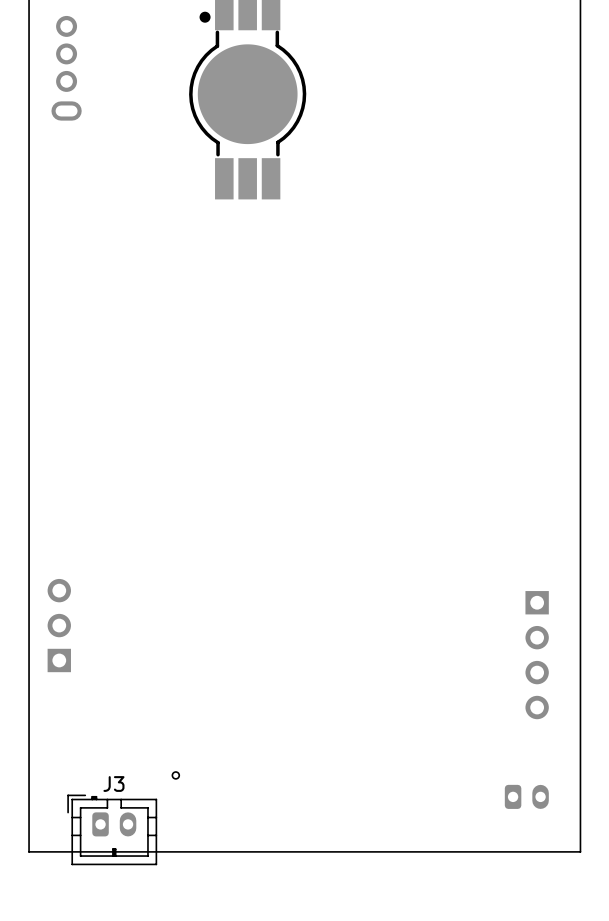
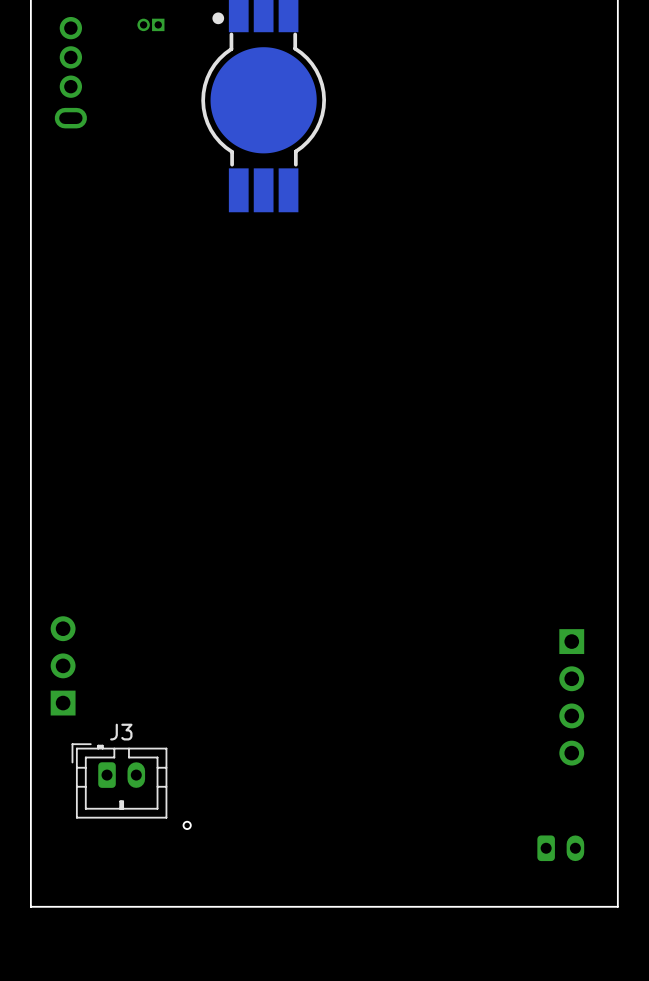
part: none -> (150, 24)
J3 position: (112, 829) -> (119, 780)

